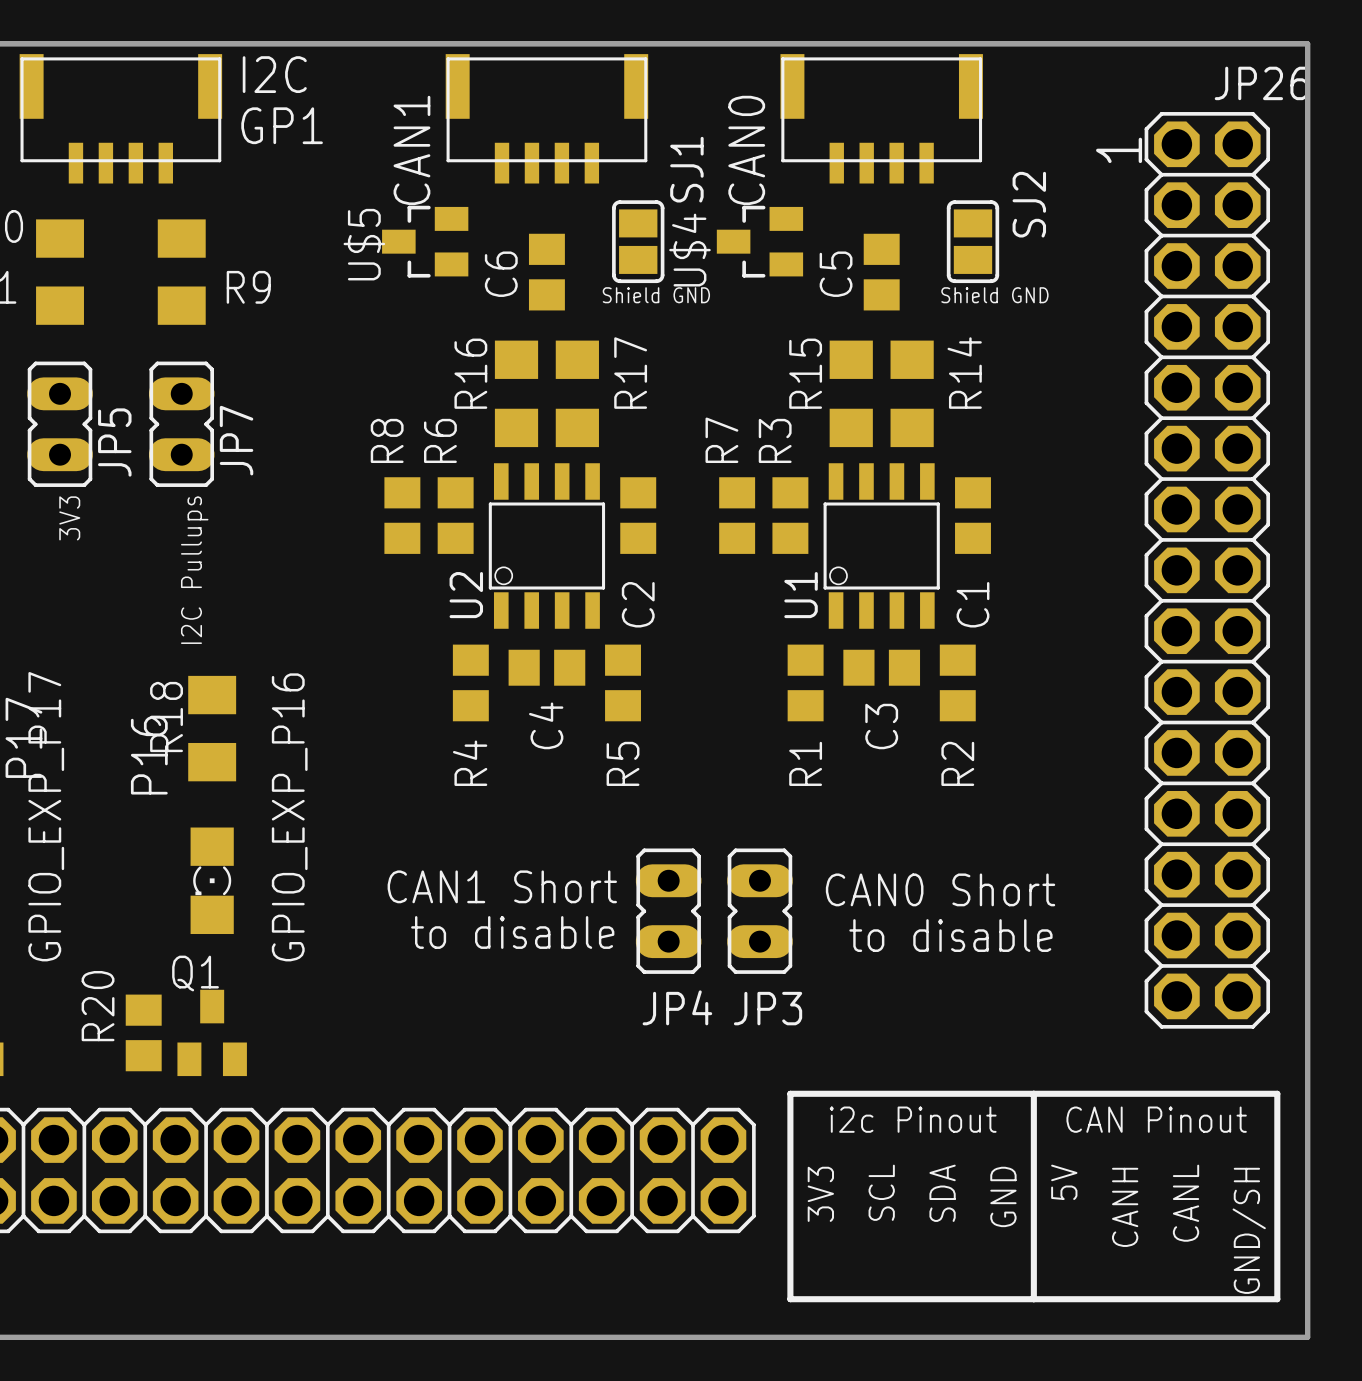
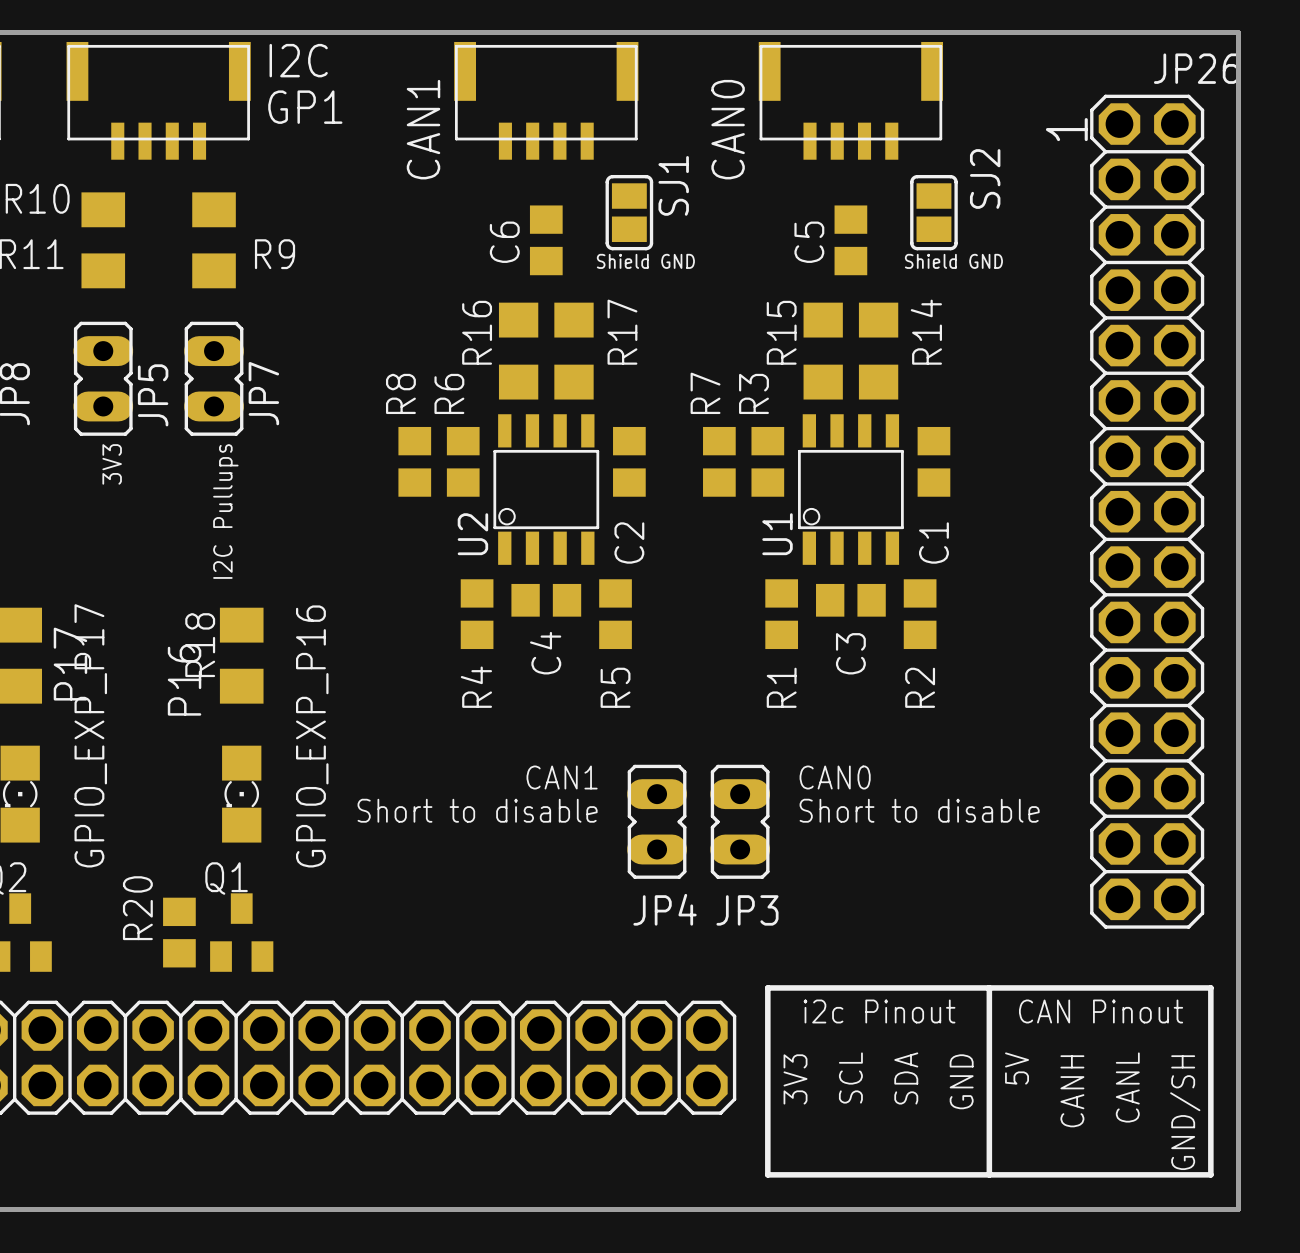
SJ1 name position: SJ1 (686, 169) -> SJ1 (673, 185)
U$5: (425, 241) -> none
U$4: (759, 241) -> none
text: none -> CAN1 (562, 777)
text: none -> CAN0 (835, 777)
text: CAN1 Short (502, 886) -> Short to disable (477, 810)
text: CAN0 Short (940, 889) -> none
text: to disable (512, 932) -> none
text: to disable (950, 935) -> Short to disable (919, 810)

